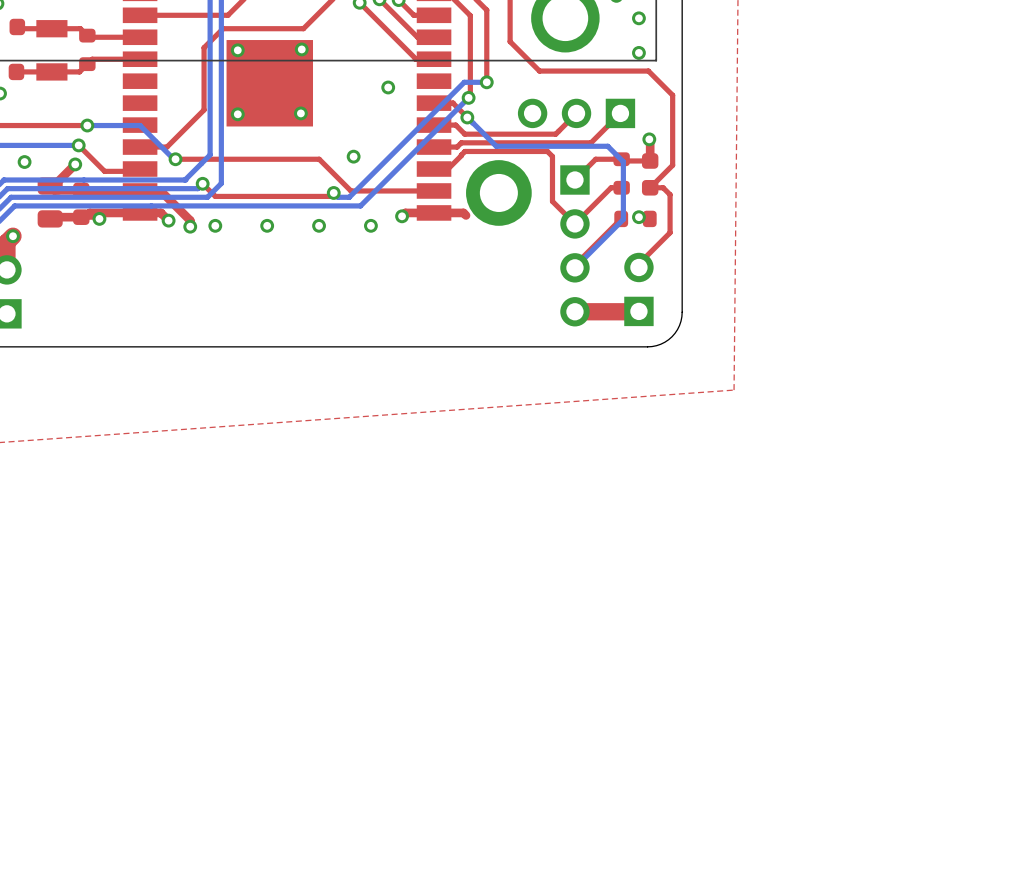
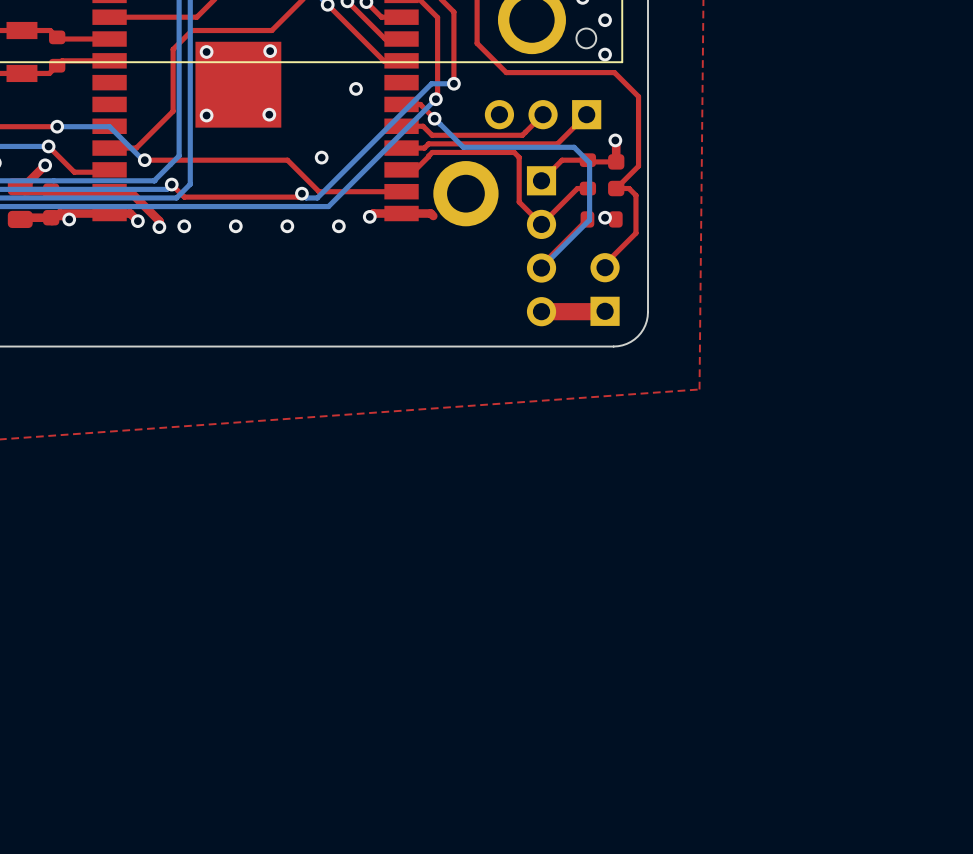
round board edge: none -> [576, 28, 597, 49]

